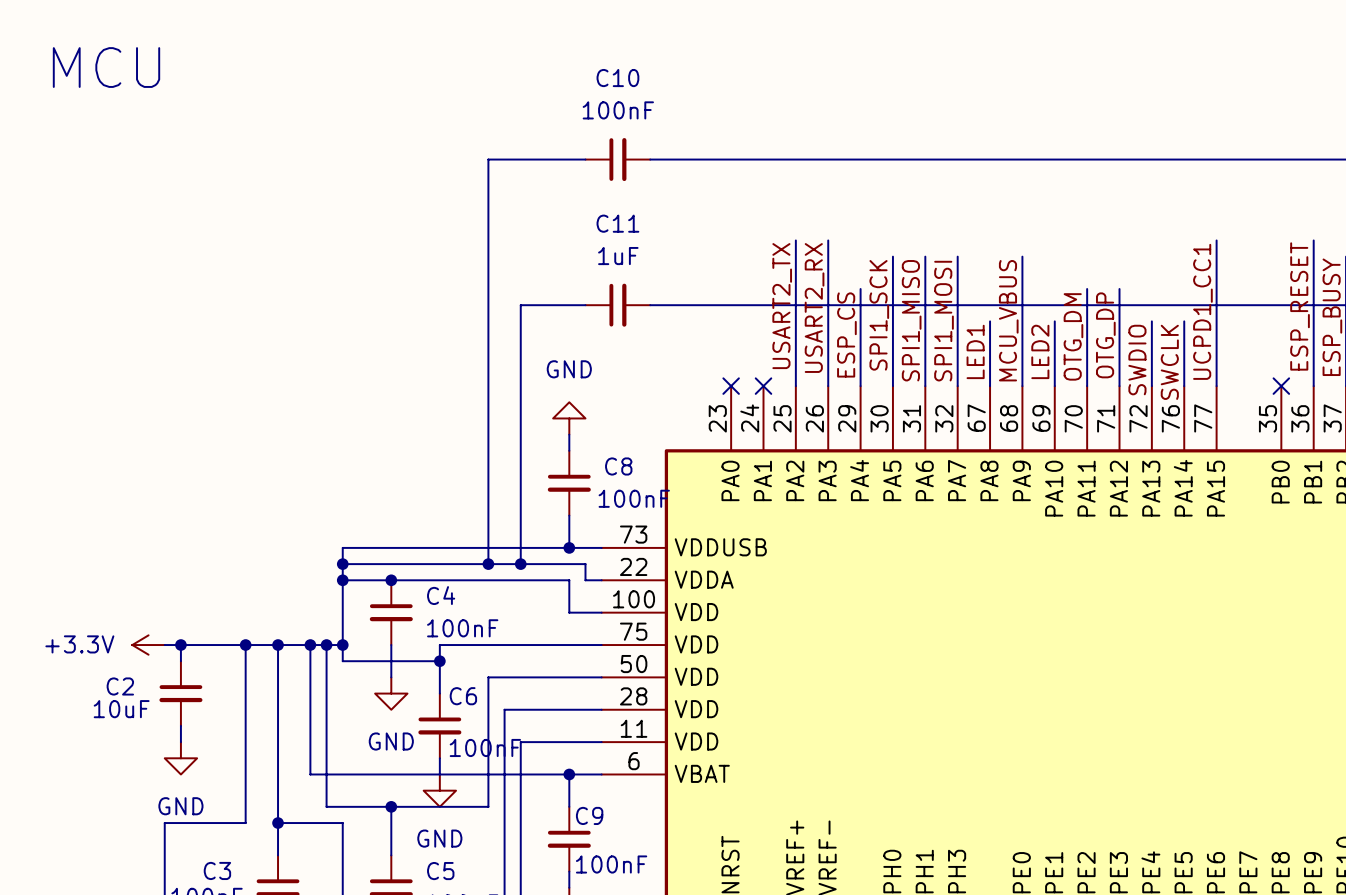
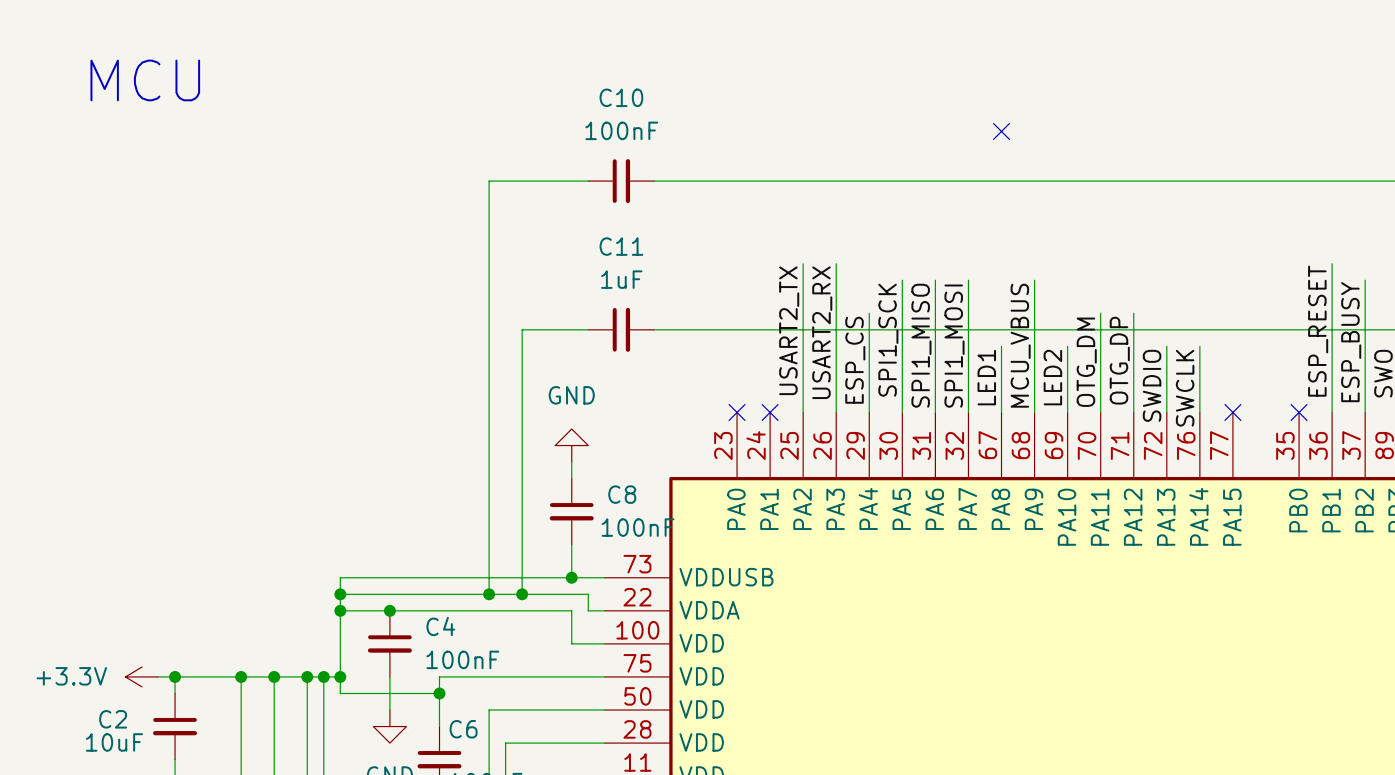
text position: MCU (106, 67) -> MCU (145, 80)
no-connect mark: none -> (1001, 131)
wire: (1216, 240) (1216, 386) -> none
label: UCPD1_CC1 (1202, 311) -> none
no-connect mark: none -> (1232, 412)

